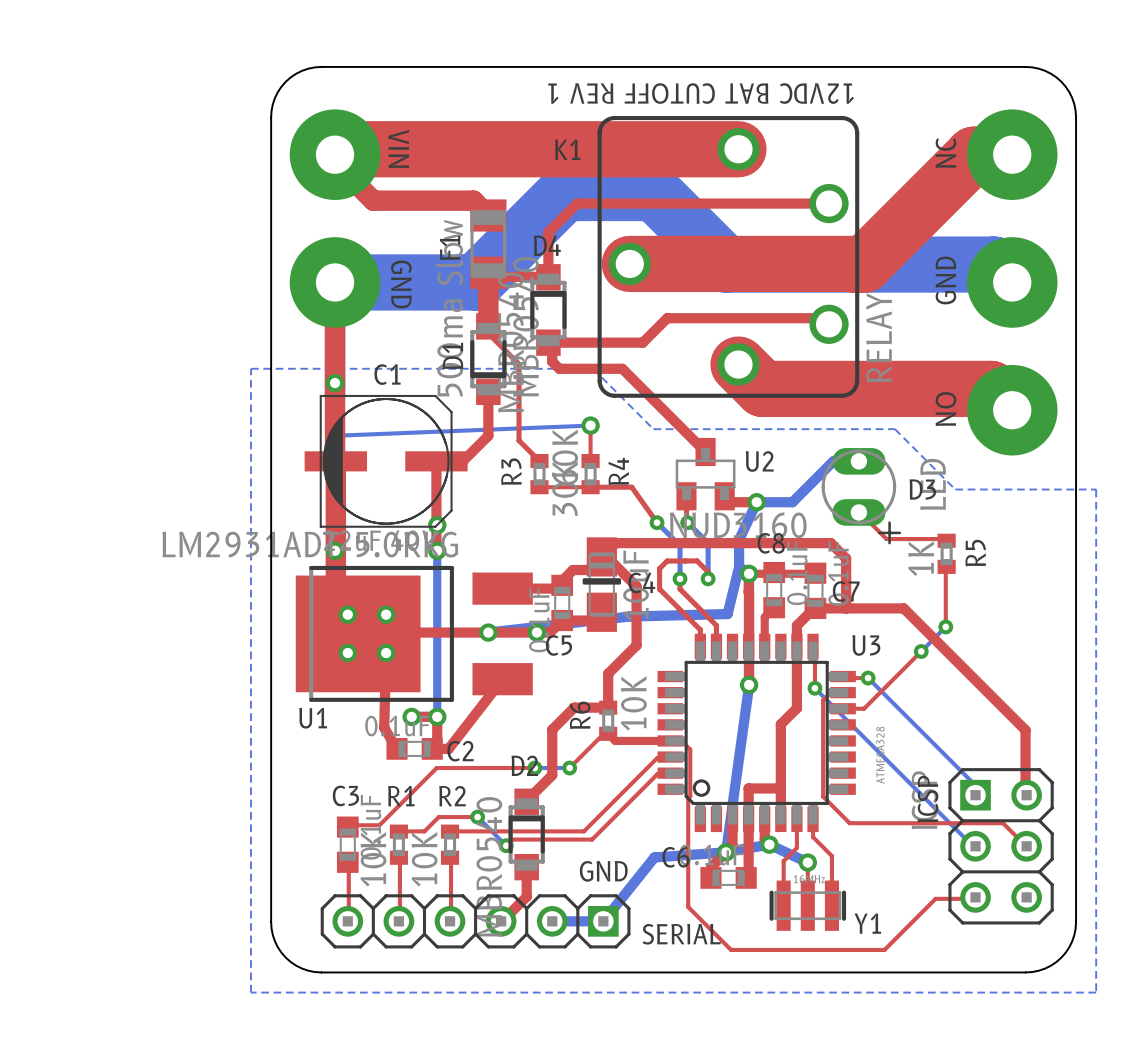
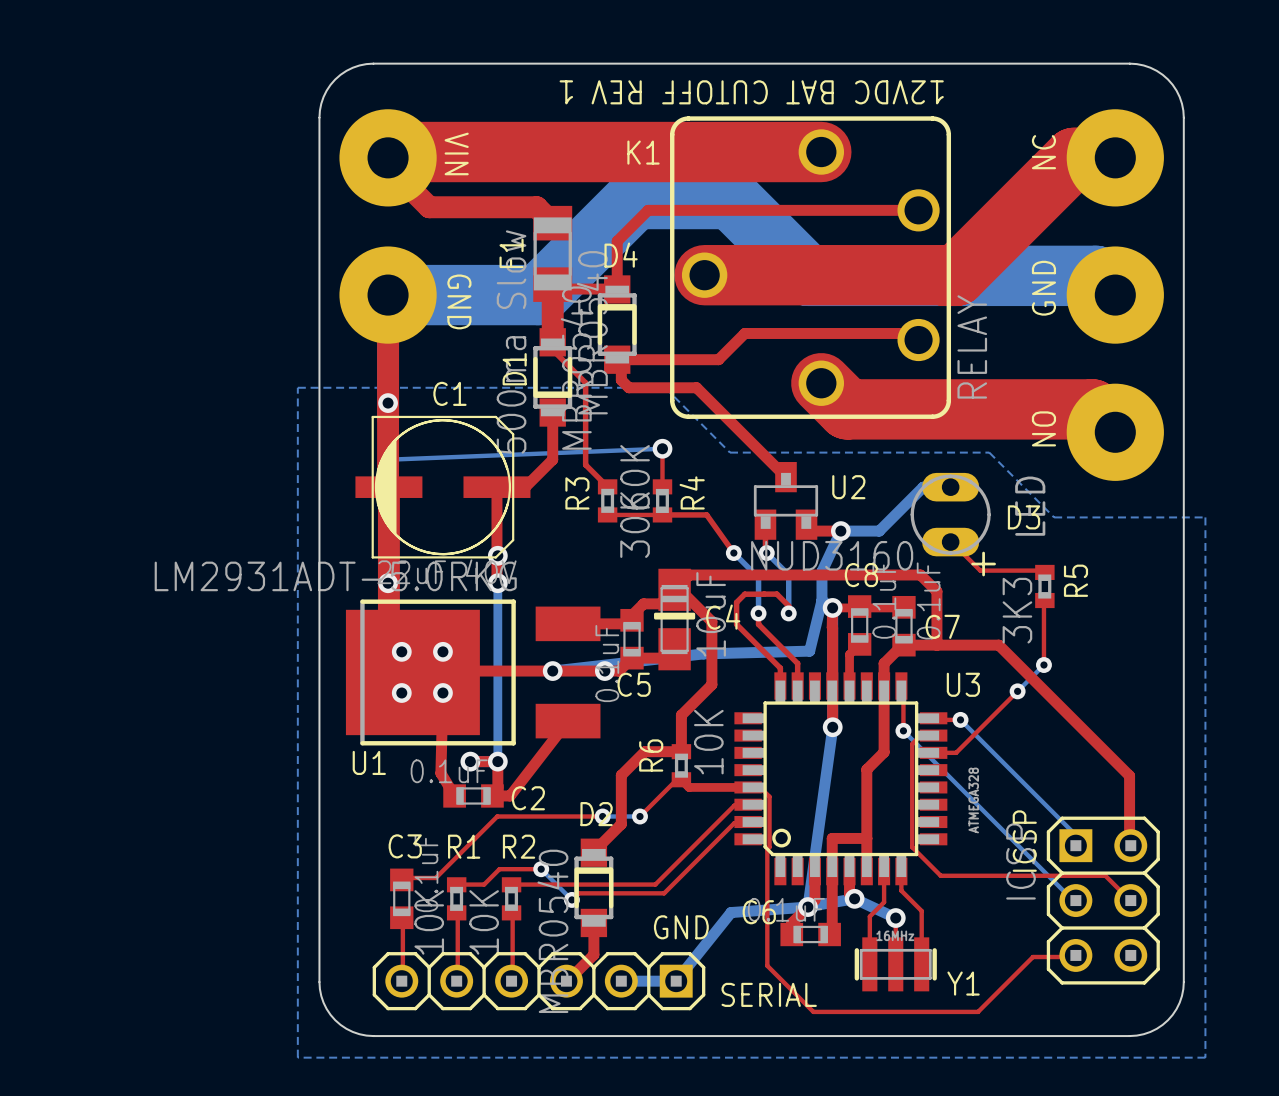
R5 value: 1K (921, 558) -> 3K3 (1017, 610)

